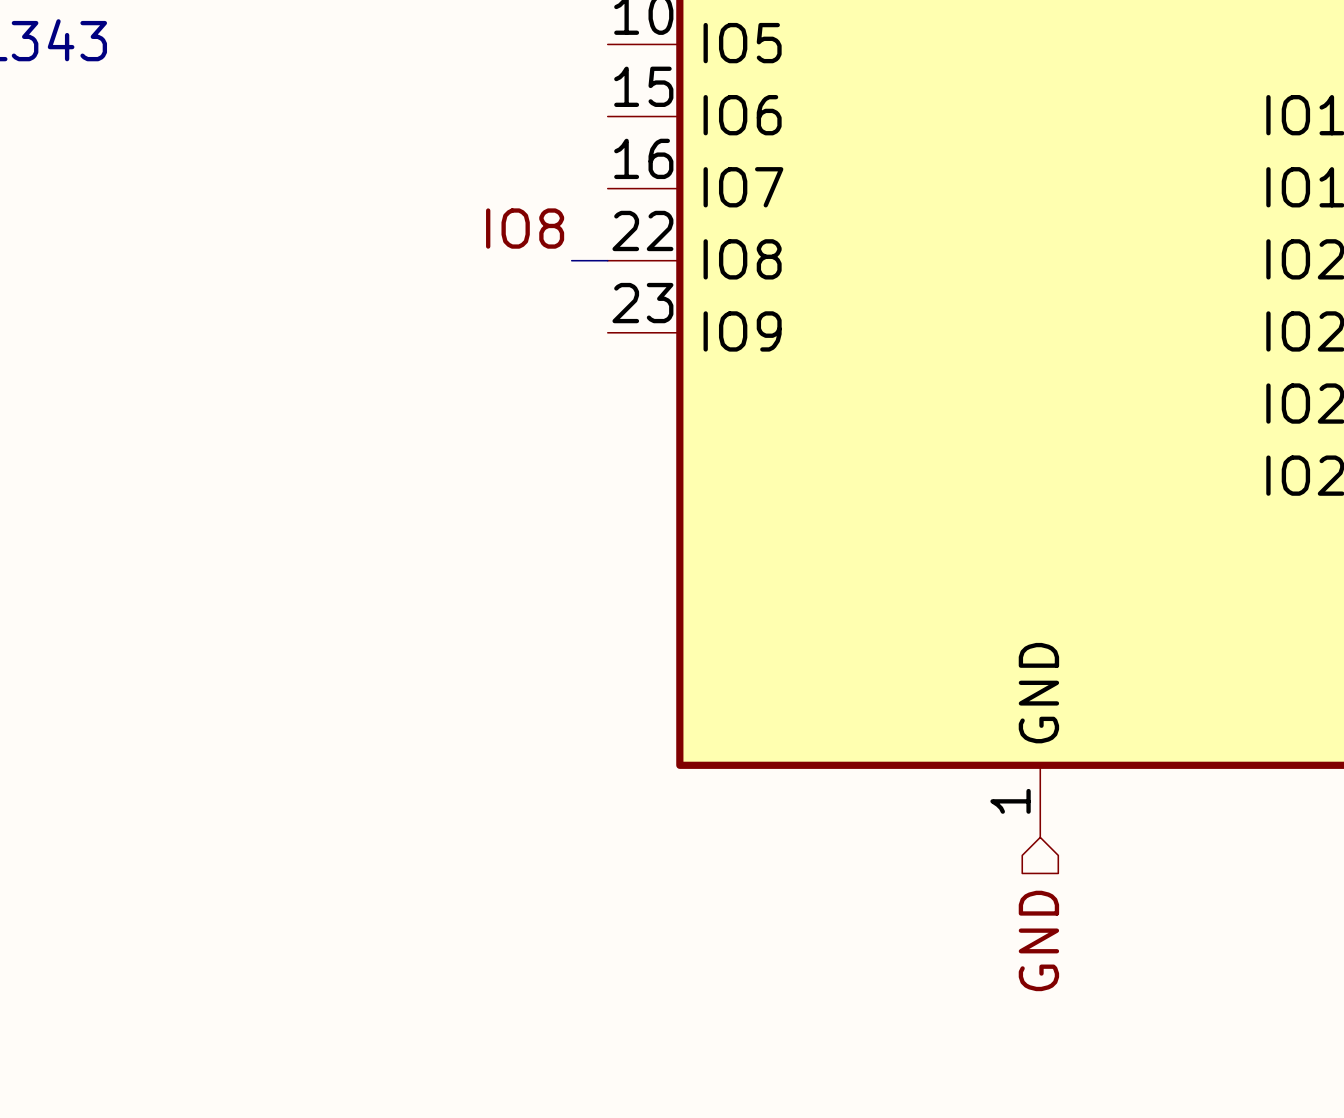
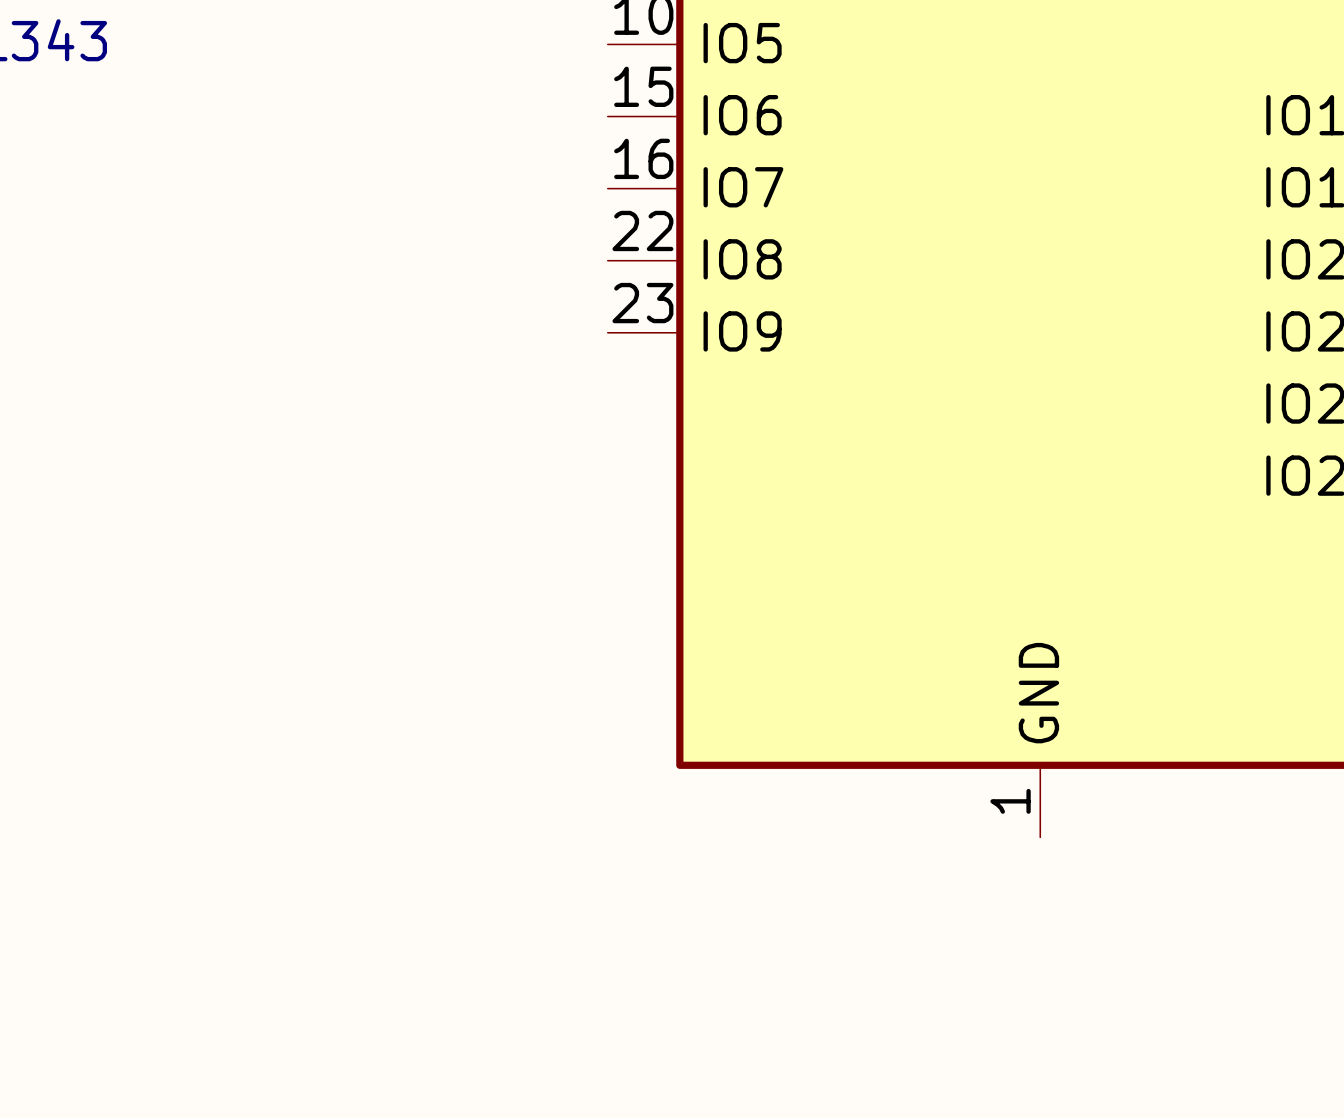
label: IO8 (525, 228) -> none
wire: (571, 260) (607, 260) -> none
hierarchical label: GND (1038, 940) -> none

